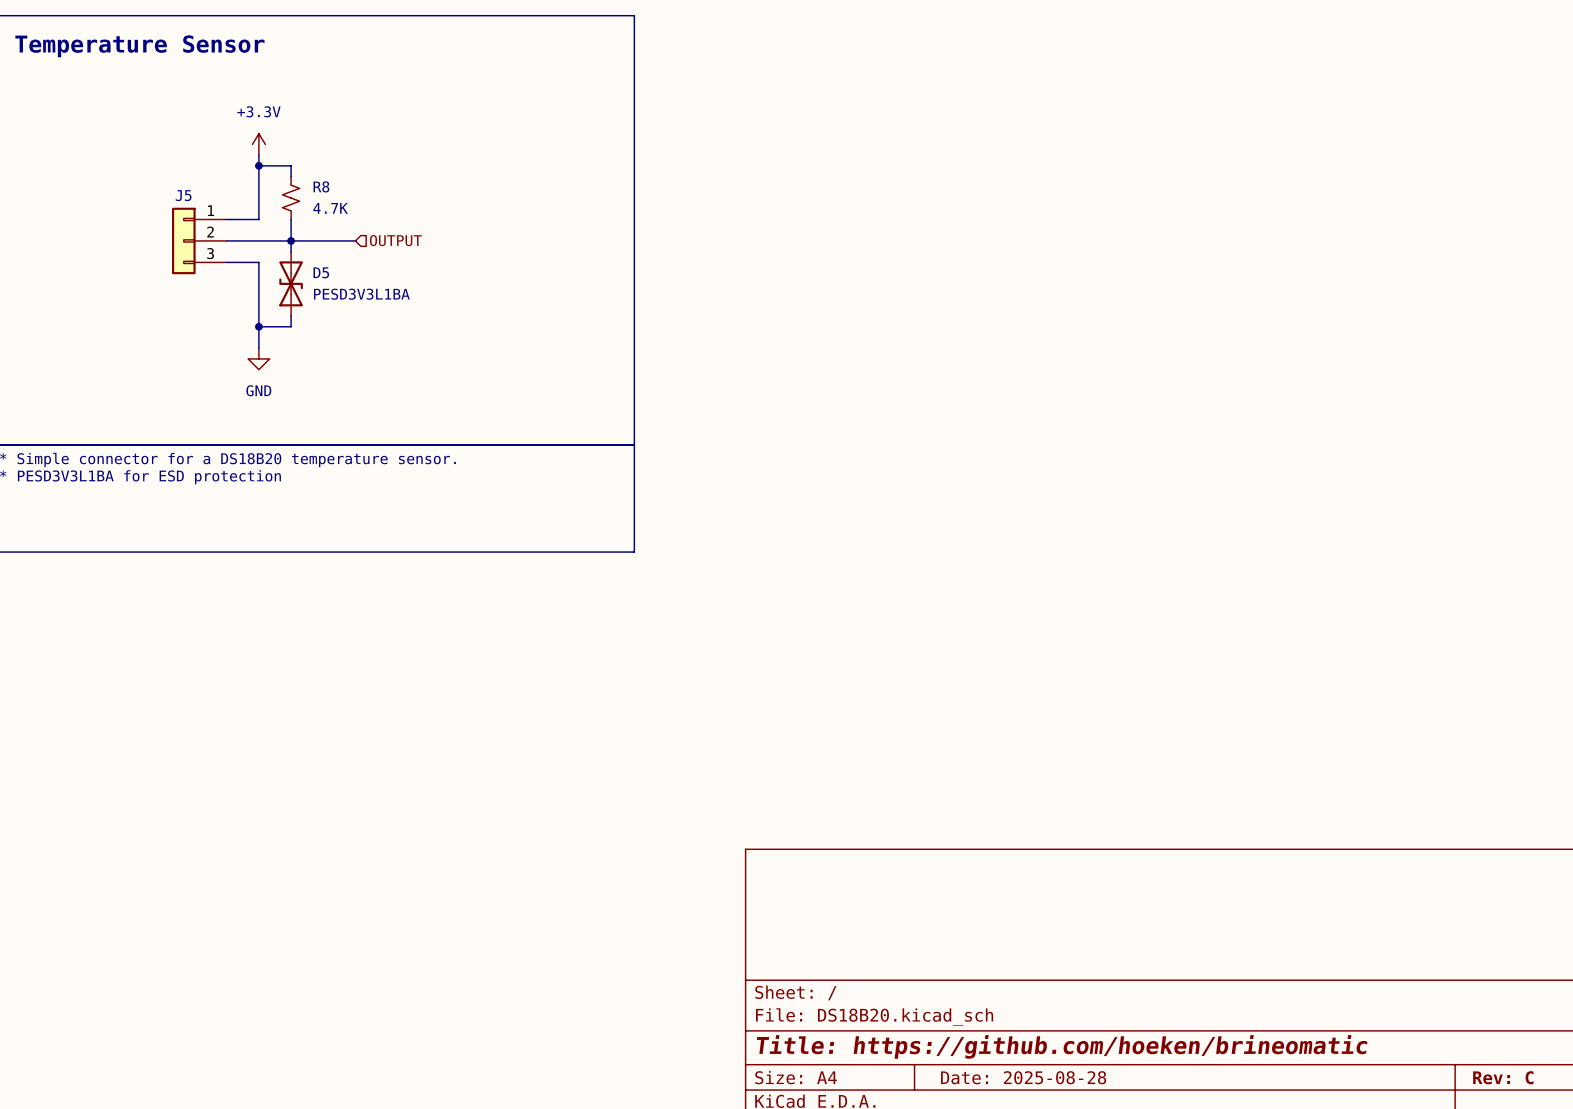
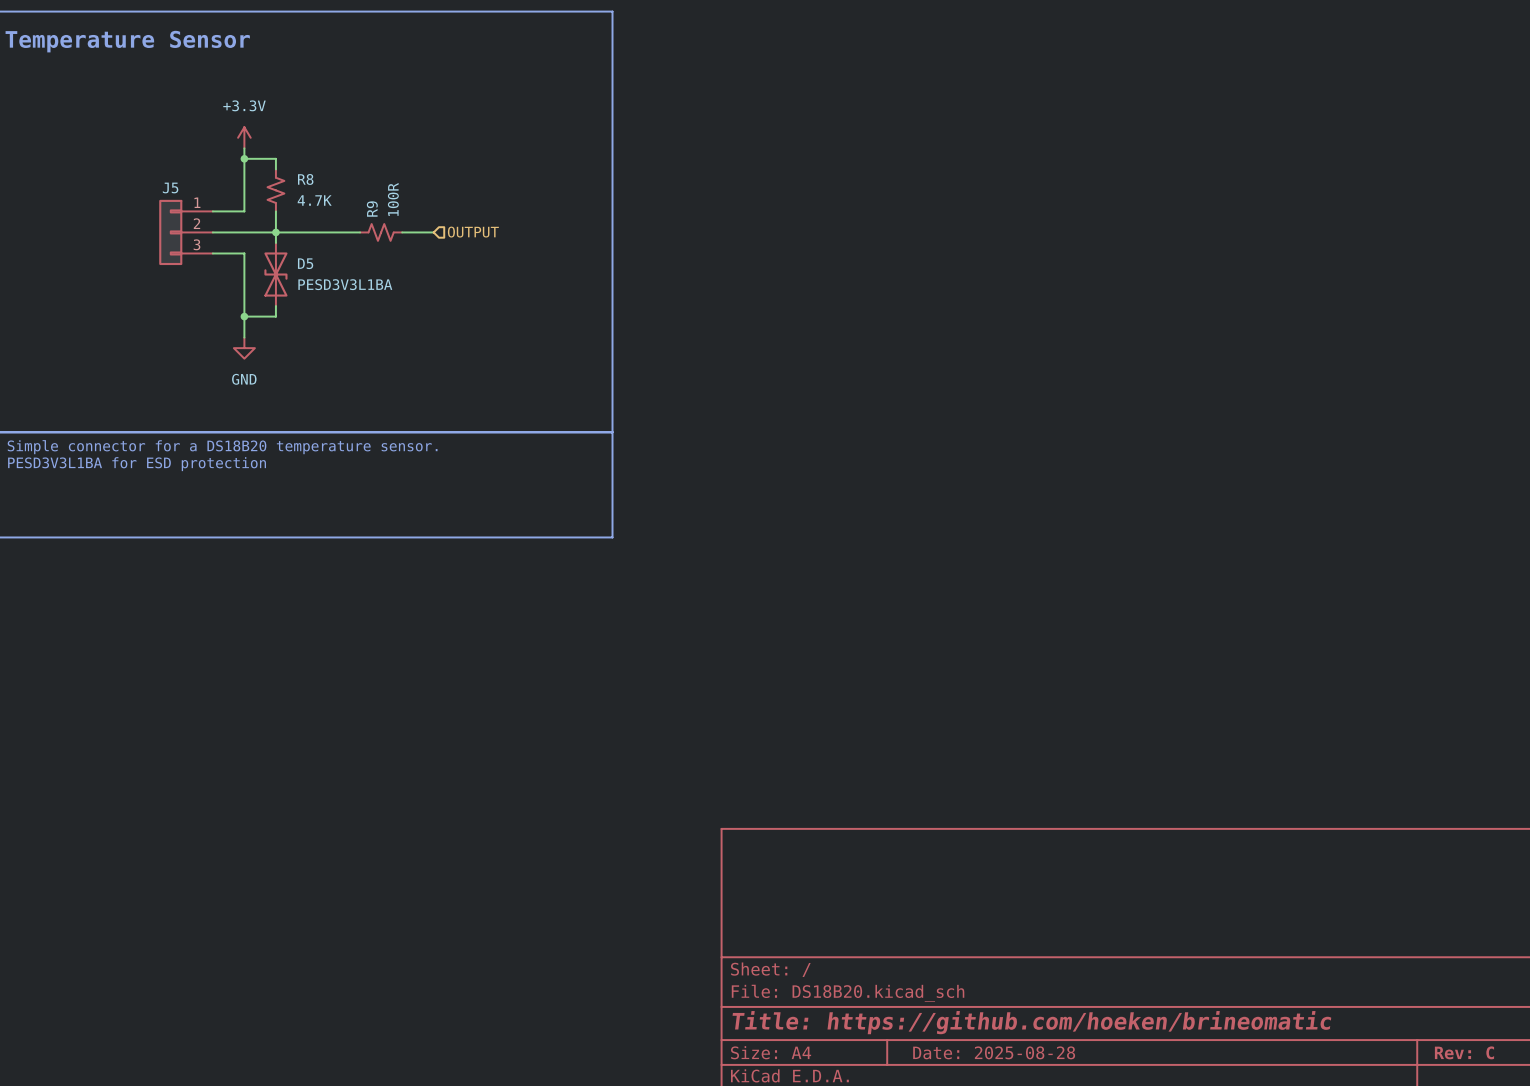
wire: none -> (339, 232) (360, 232)
hierarchical label position: OUTPUT (395, 240) -> OUTPUT (473, 232)
R9: none -> 100R (381, 232)
wire: none -> (402, 232) (433, 232)

